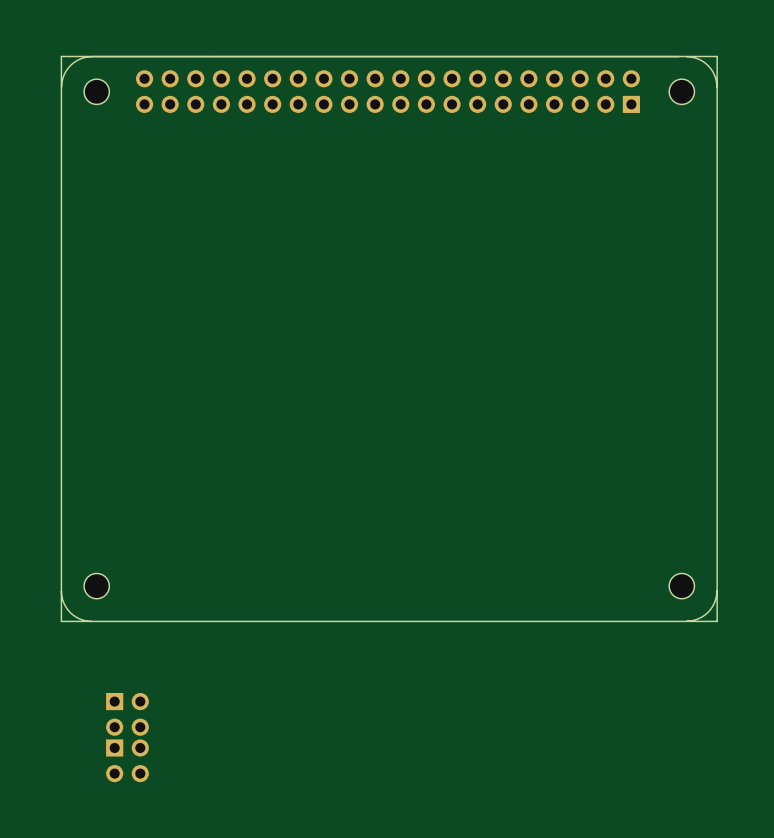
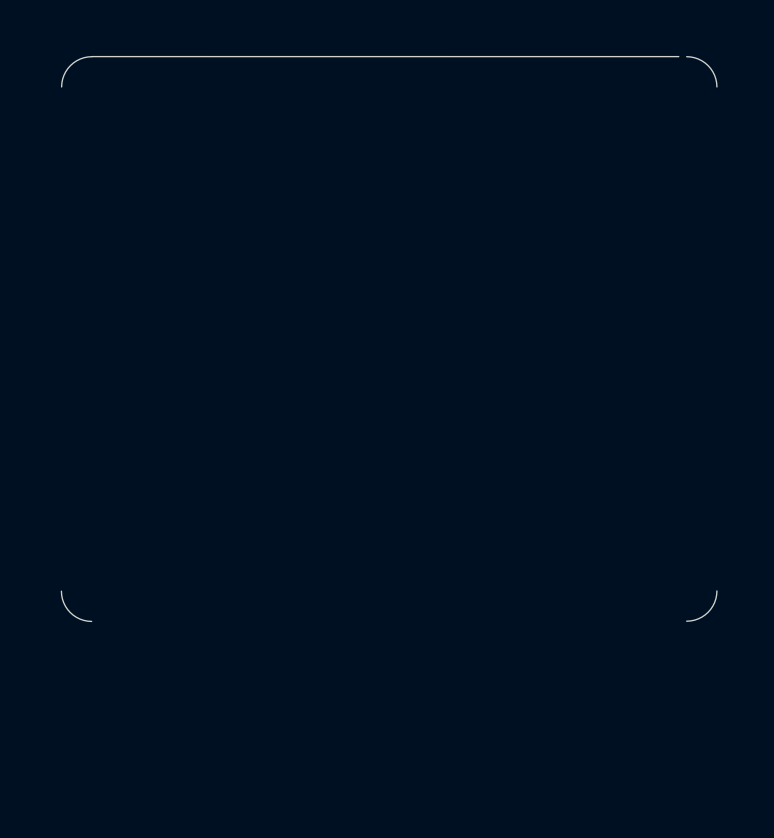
board edge: (717, 56) (61, 56) (61, 621) (717, 621) (717, 56) -> none
part: (96, 91) -> none
part: (387, 91) -> none
part: (681, 91) -> none
part: (96, 586) -> none
part: (681, 586) -> none
part: (127, 714) -> none
part: (127, 760) -> none

